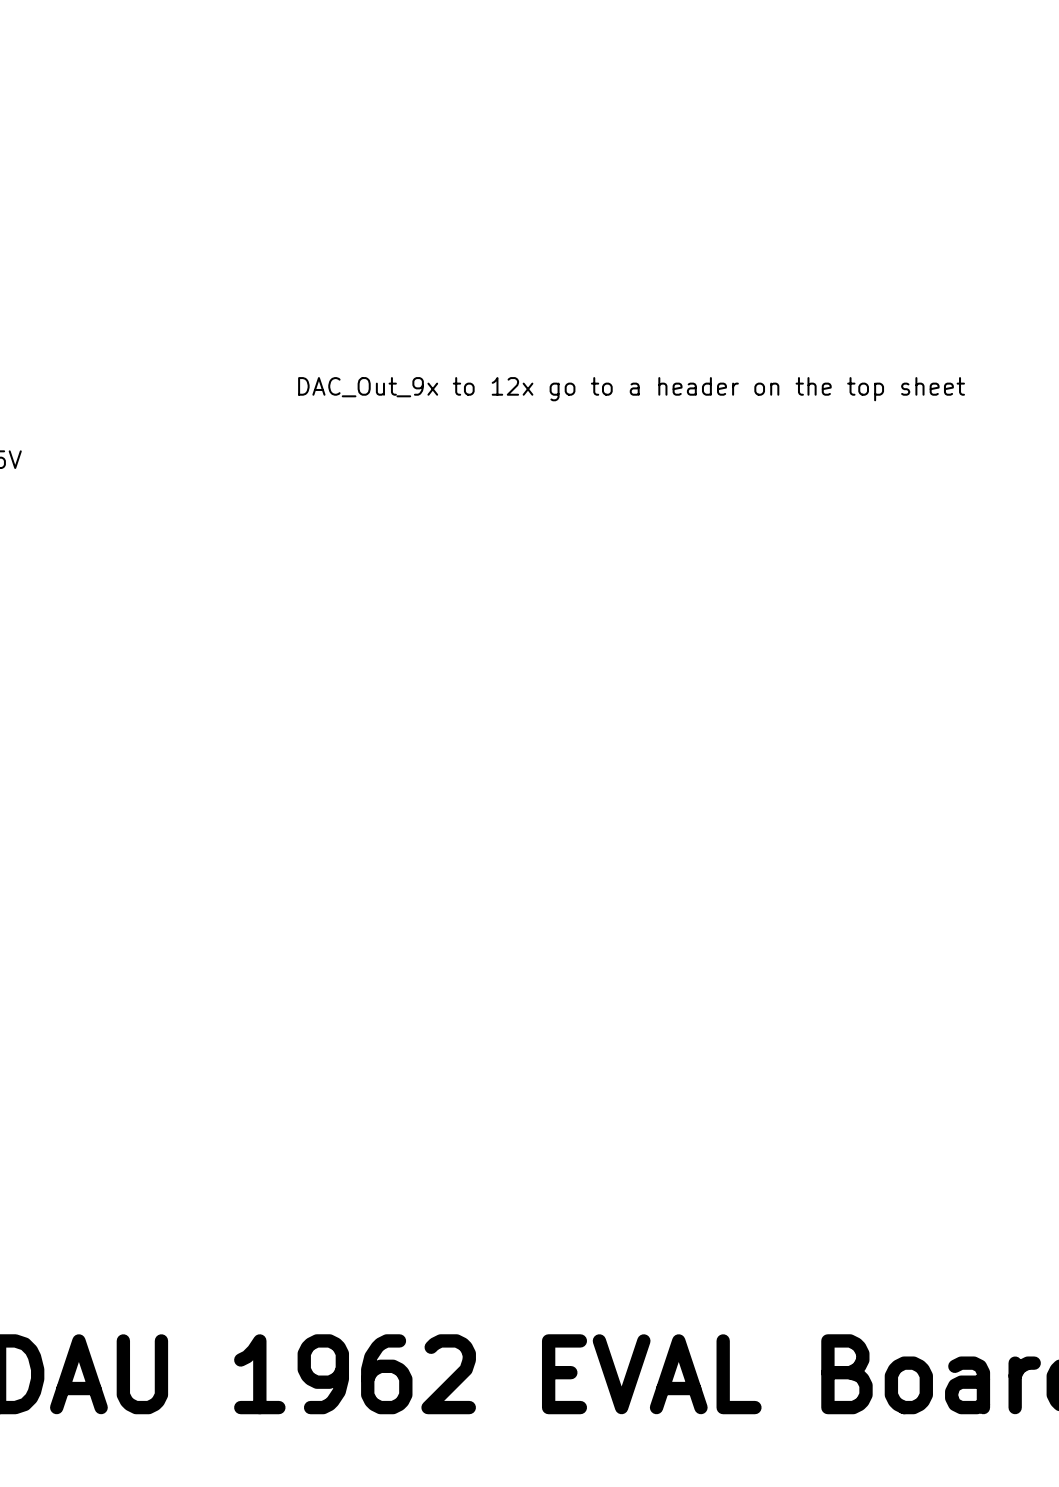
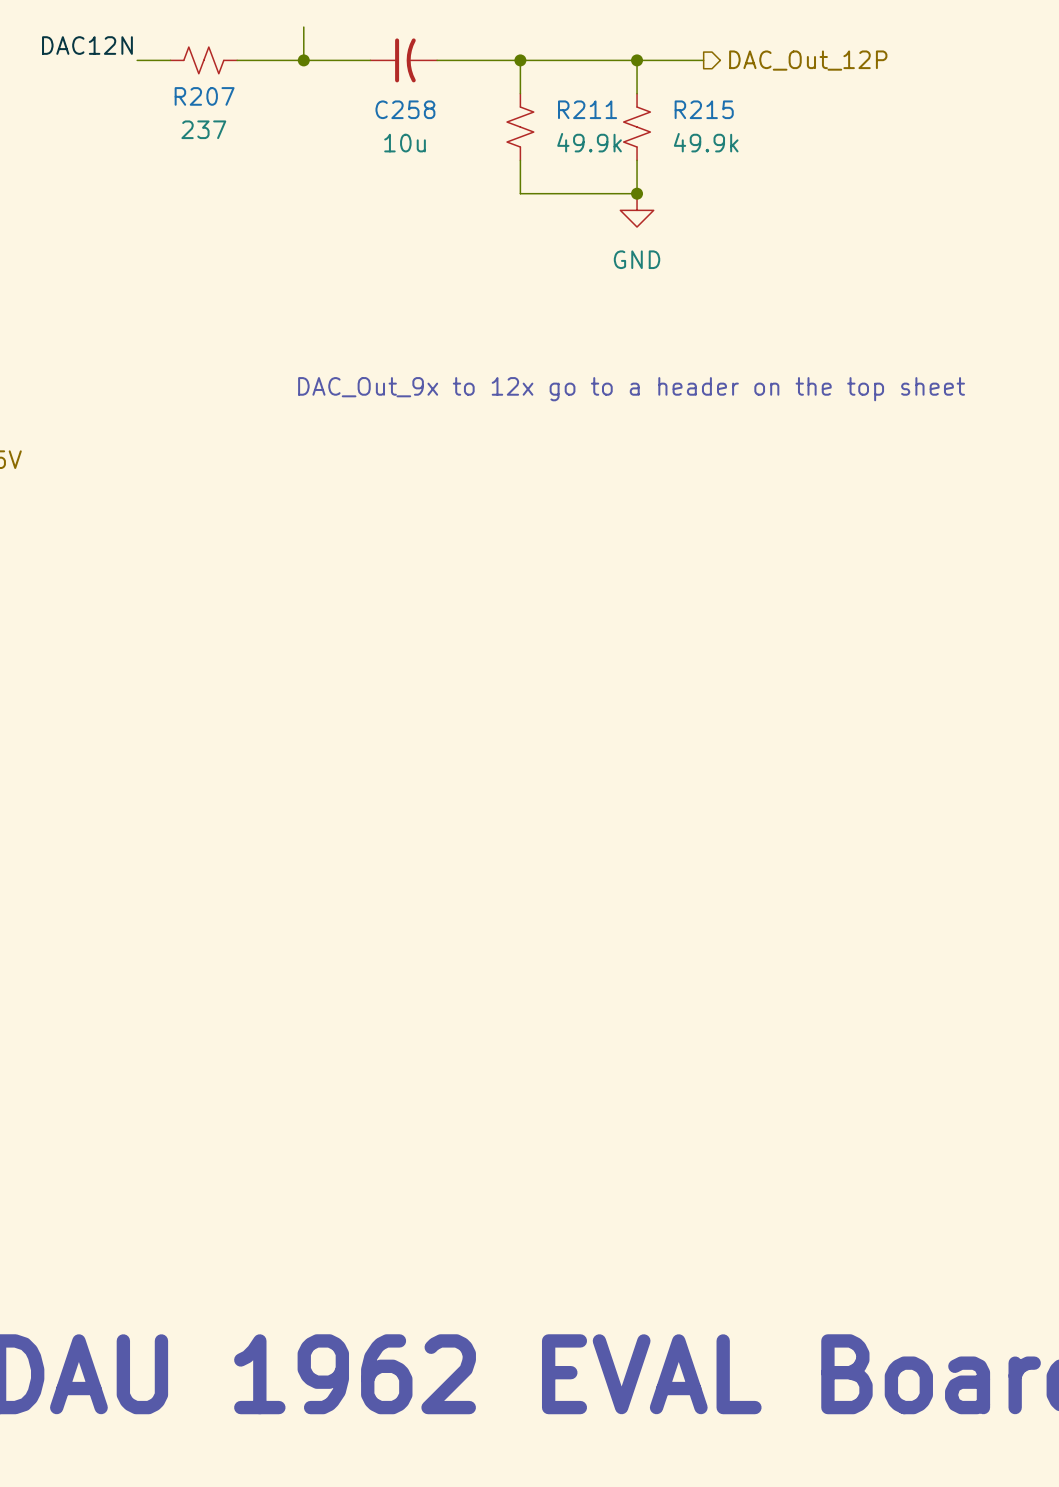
wire: none -> (303, 27) (303, 60)
label: none -> DAC12N (87, 45)
wire: none -> (137, 60) (170, 60)
R207: none -> 237 (203, 60)
wire: none -> (237, 60) (370, 60)
junction: none -> (303, 60)
C258: none -> 10u (403, 60)
wire: none -> (437, 60) (703, 60)
wire: none -> (520, 60) (520, 93)
junction: none -> (520, 60)
wire: none -> (637, 60) (637, 93)
junction: none -> (637, 60)
hierarchical label: none -> DAC_Out_12P (808, 60)
R211: none -> 49.9k (520, 127)
R215: none -> 49.9k (637, 127)
wire: none -> (520, 160) (520, 193) (637, 193) (637, 160)
junction: none -> (637, 193)
power symbol: none -> GND (637, 210)

